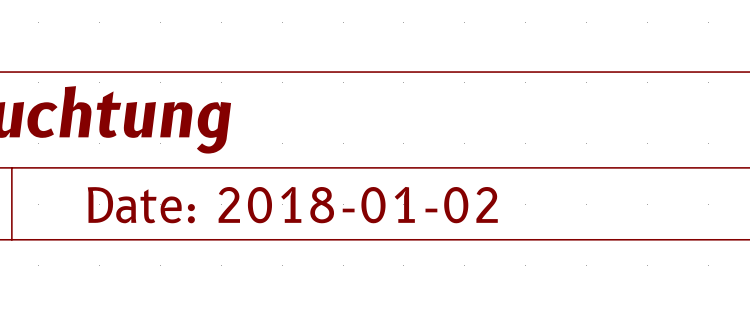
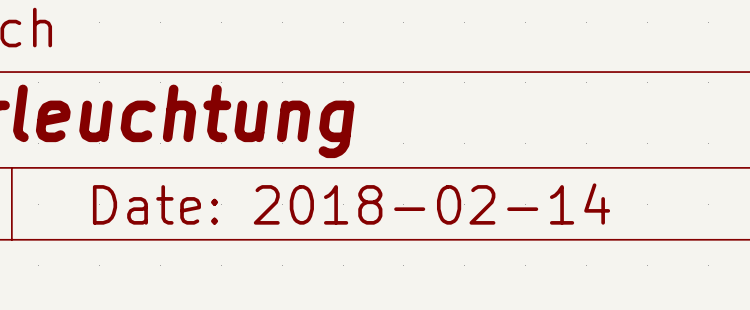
title block: Date: 2018-01-02 (292, 205) -> Date: 2018-02-14 (351, 204)

